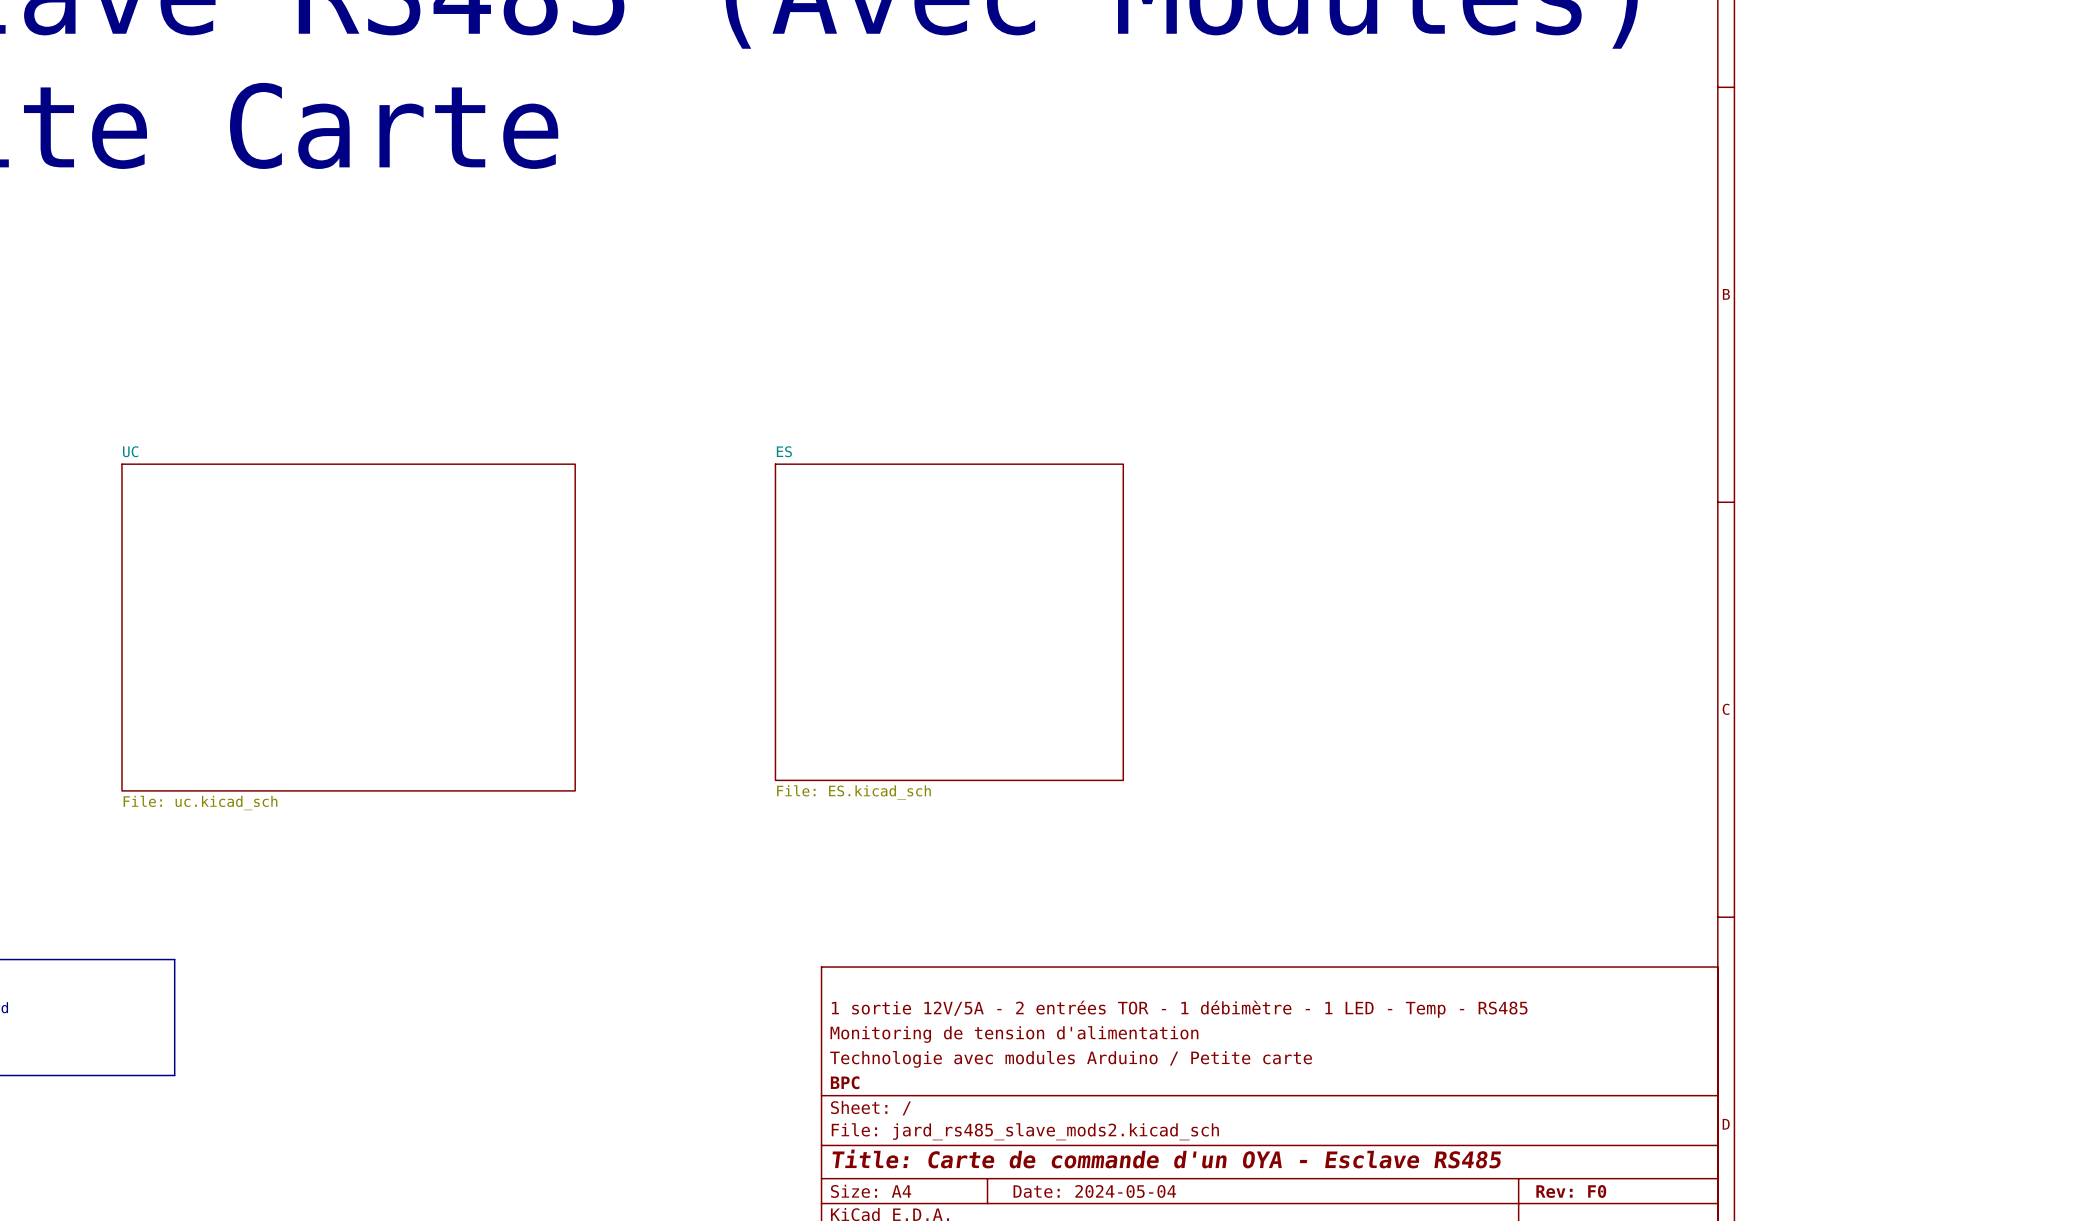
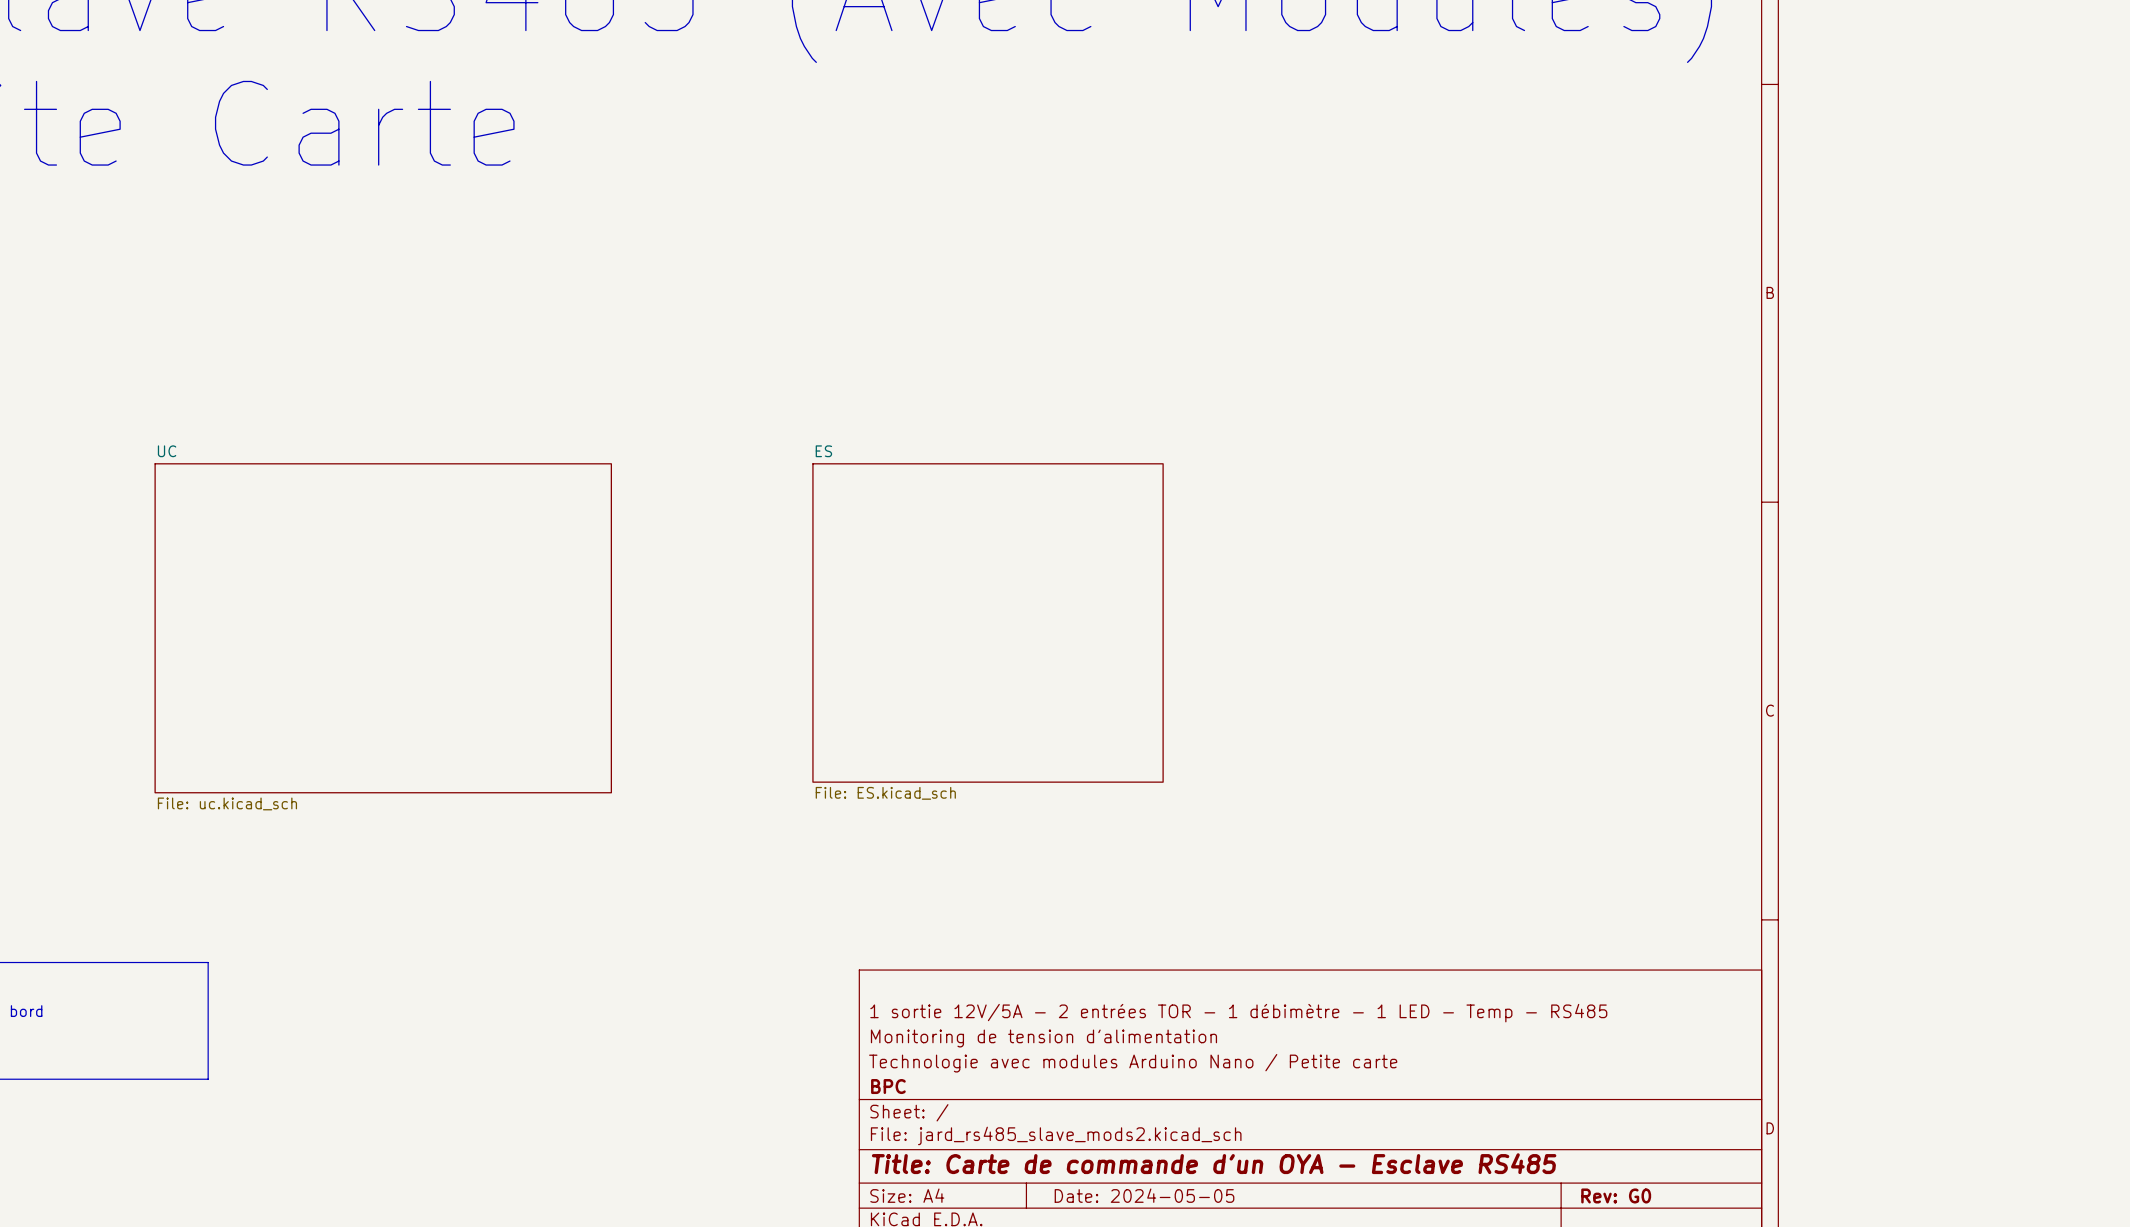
title block: Technologie avec modules Arduino / Petite carte (1071, 1059) -> Technologie avec modules Arduino Nano / Petite carte (1133, 1063)
title block: Date: 2024-05-04 (1094, 1191) -> Date: 2024-05-05 (1144, 1195)
title block: Rev: F0 (1571, 1191) -> Rev: G0 (1616, 1195)

